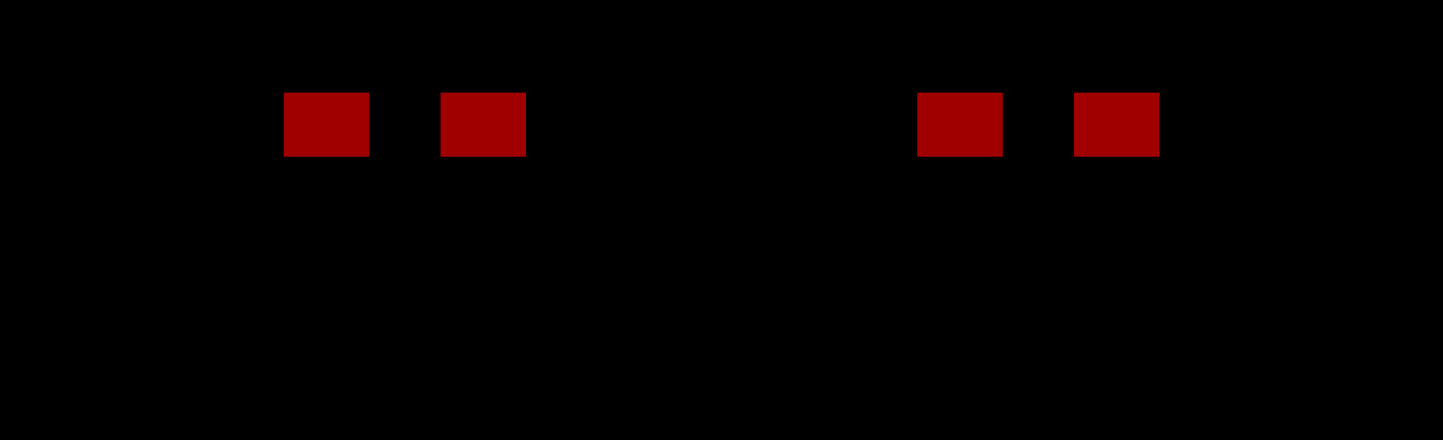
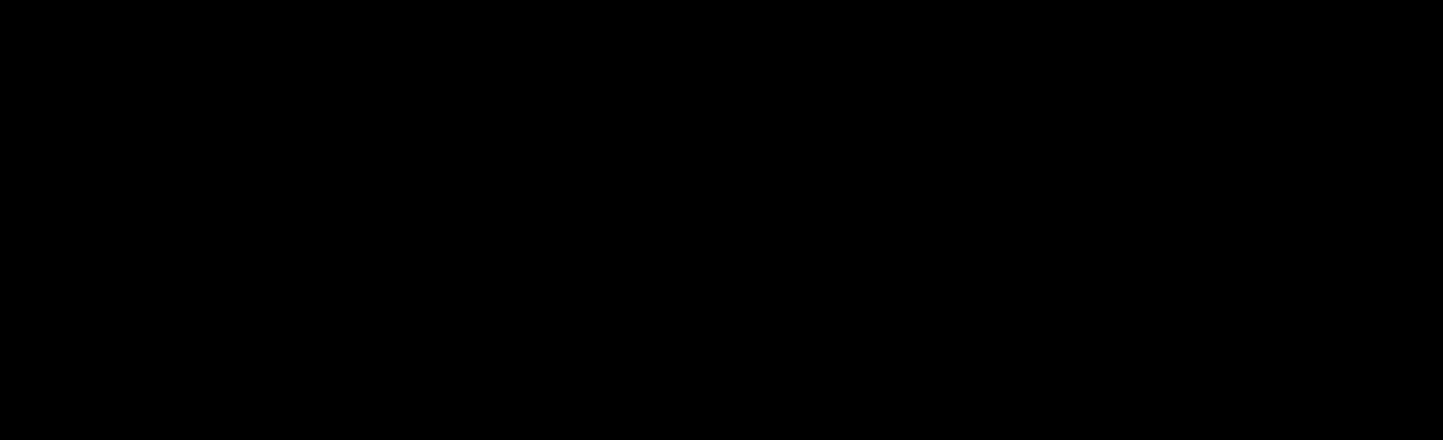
part: (404, 124) -> none
part: (1038, 124) -> none

